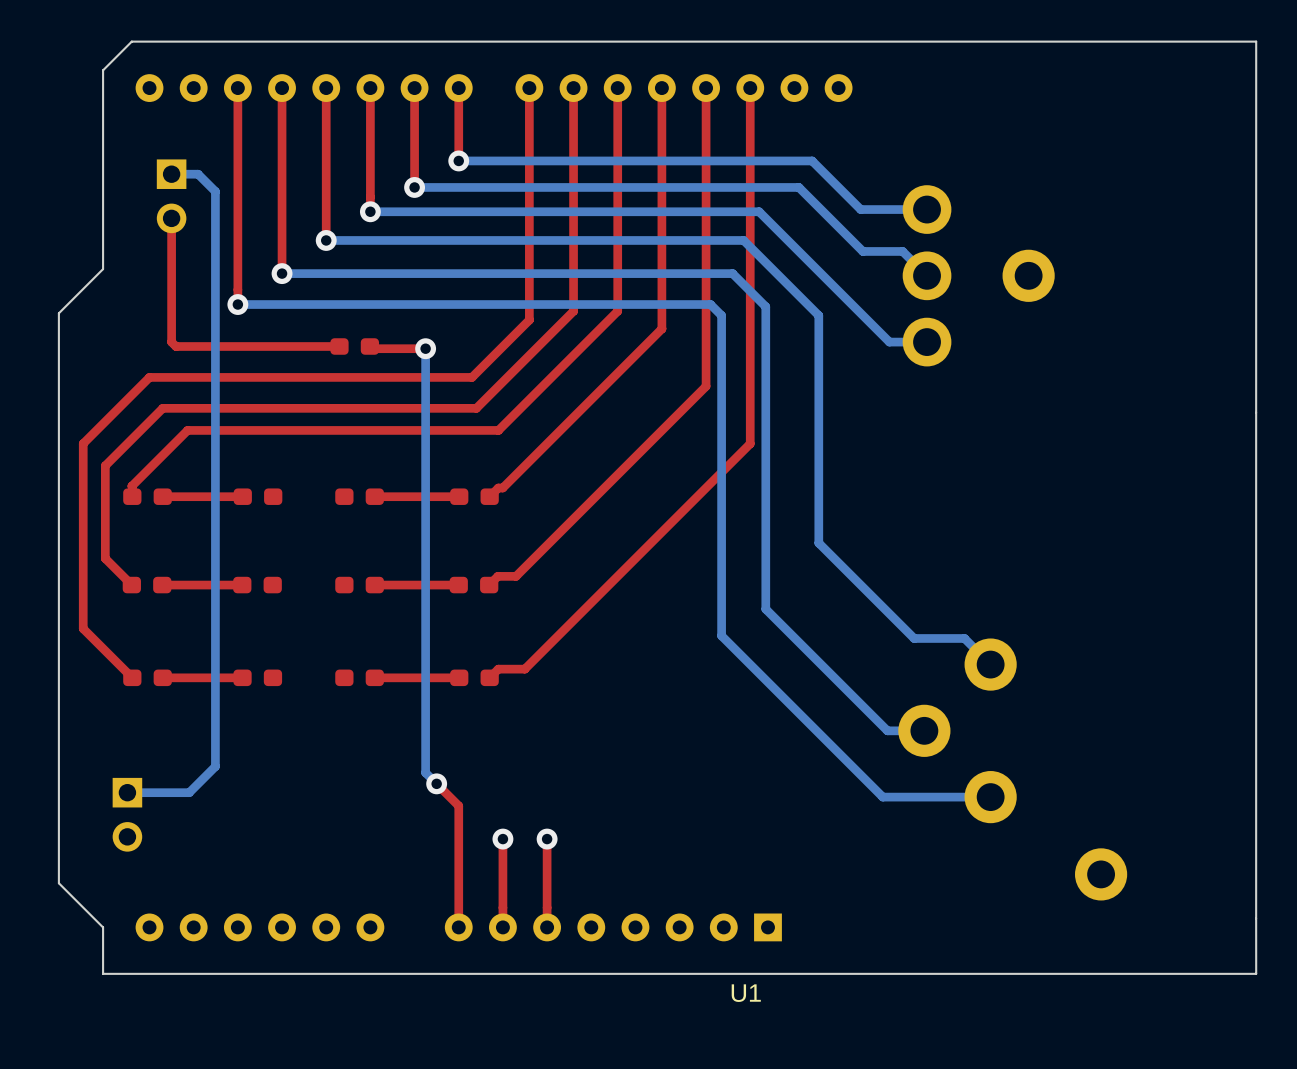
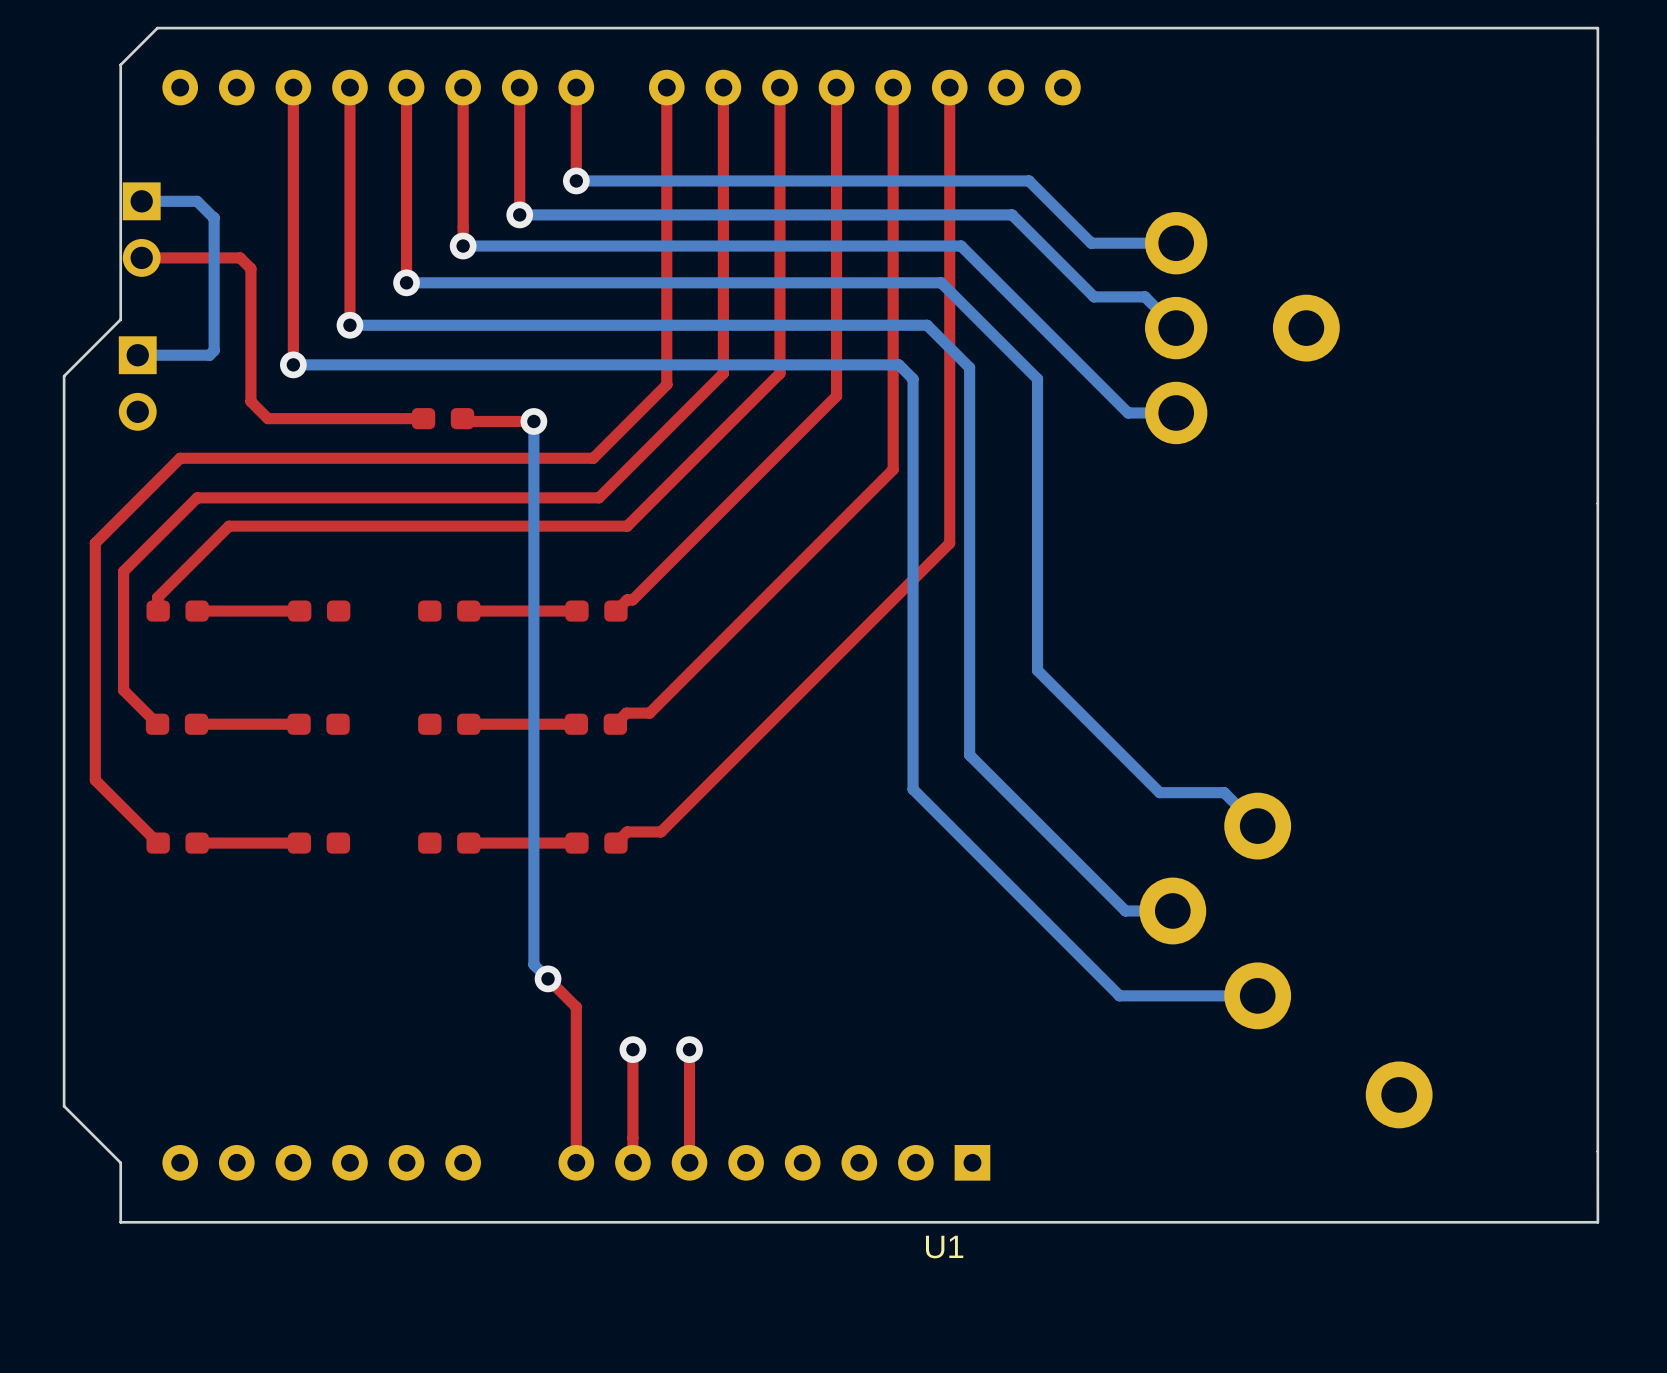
bottom track: (171, 174) (198, 174) (215, 191) (215, 766) (189, 792) (127, 792) -> none
bottom track: none -> (141, 201) (197, 201) (214, 217) (214, 350) (209, 355) (137, 355)
part position: (171, 196) -> (141, 229)
top track: (171, 218) (171, 342) (176, 346) (217, 346) -> (141, 257) (240, 257) (250, 268) (250, 401) (267, 418)
part: none -> (137, 383)
part: (127, 814) -> none

